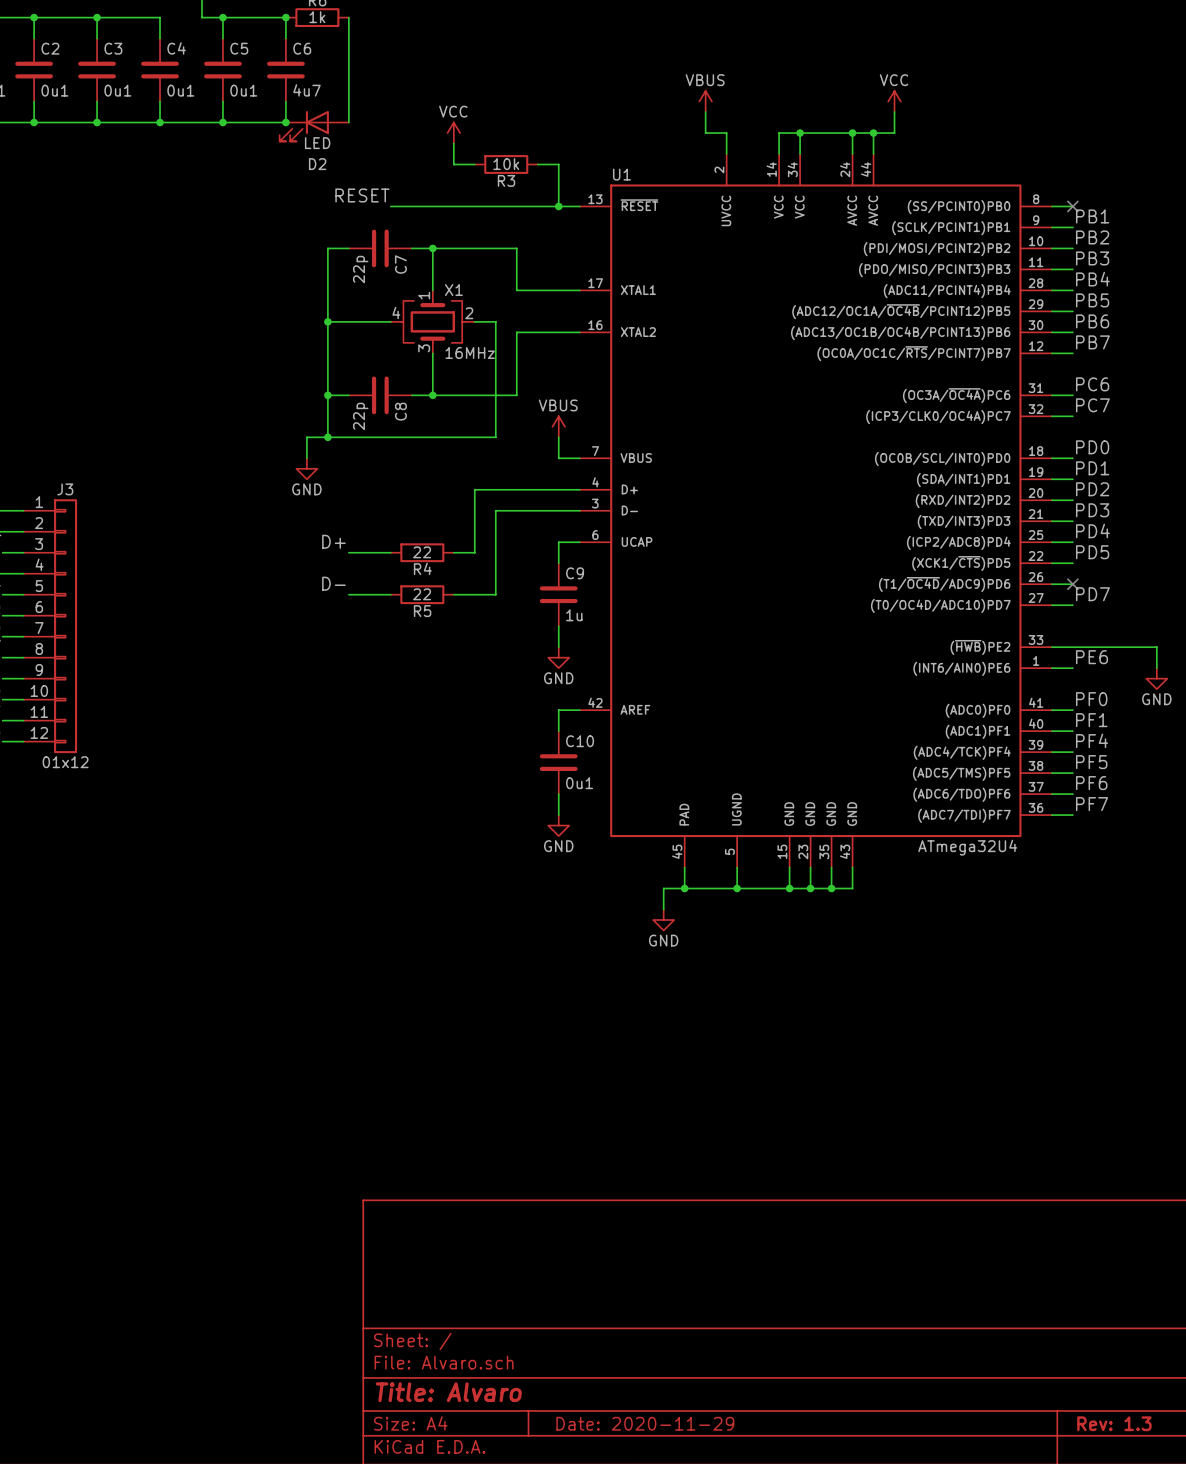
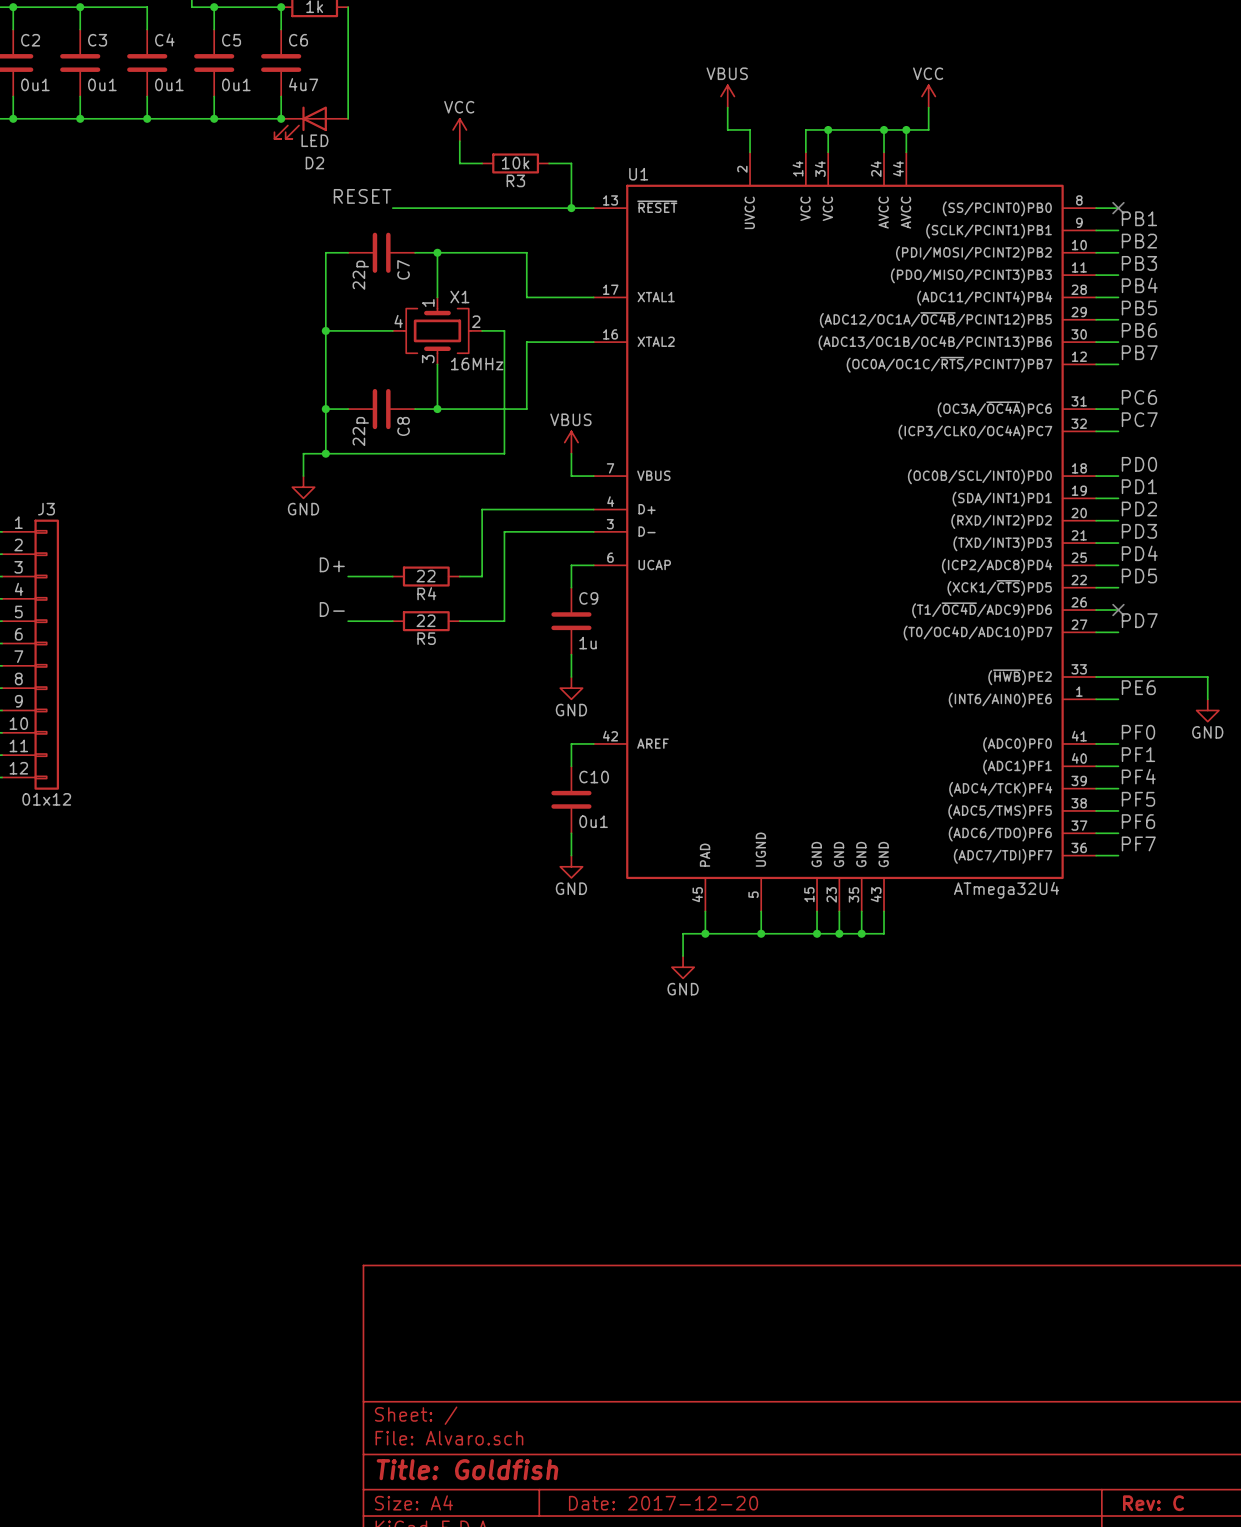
title block: Title: Alvaro (448, 1392) -> Title: Goldfish (467, 1469)
title block: Date: 2020-11-29 (645, 1423) -> Date: 2017-12-20 (663, 1503)
title block: Rev: 1.3 (1114, 1423) -> Rev: C (1153, 1503)

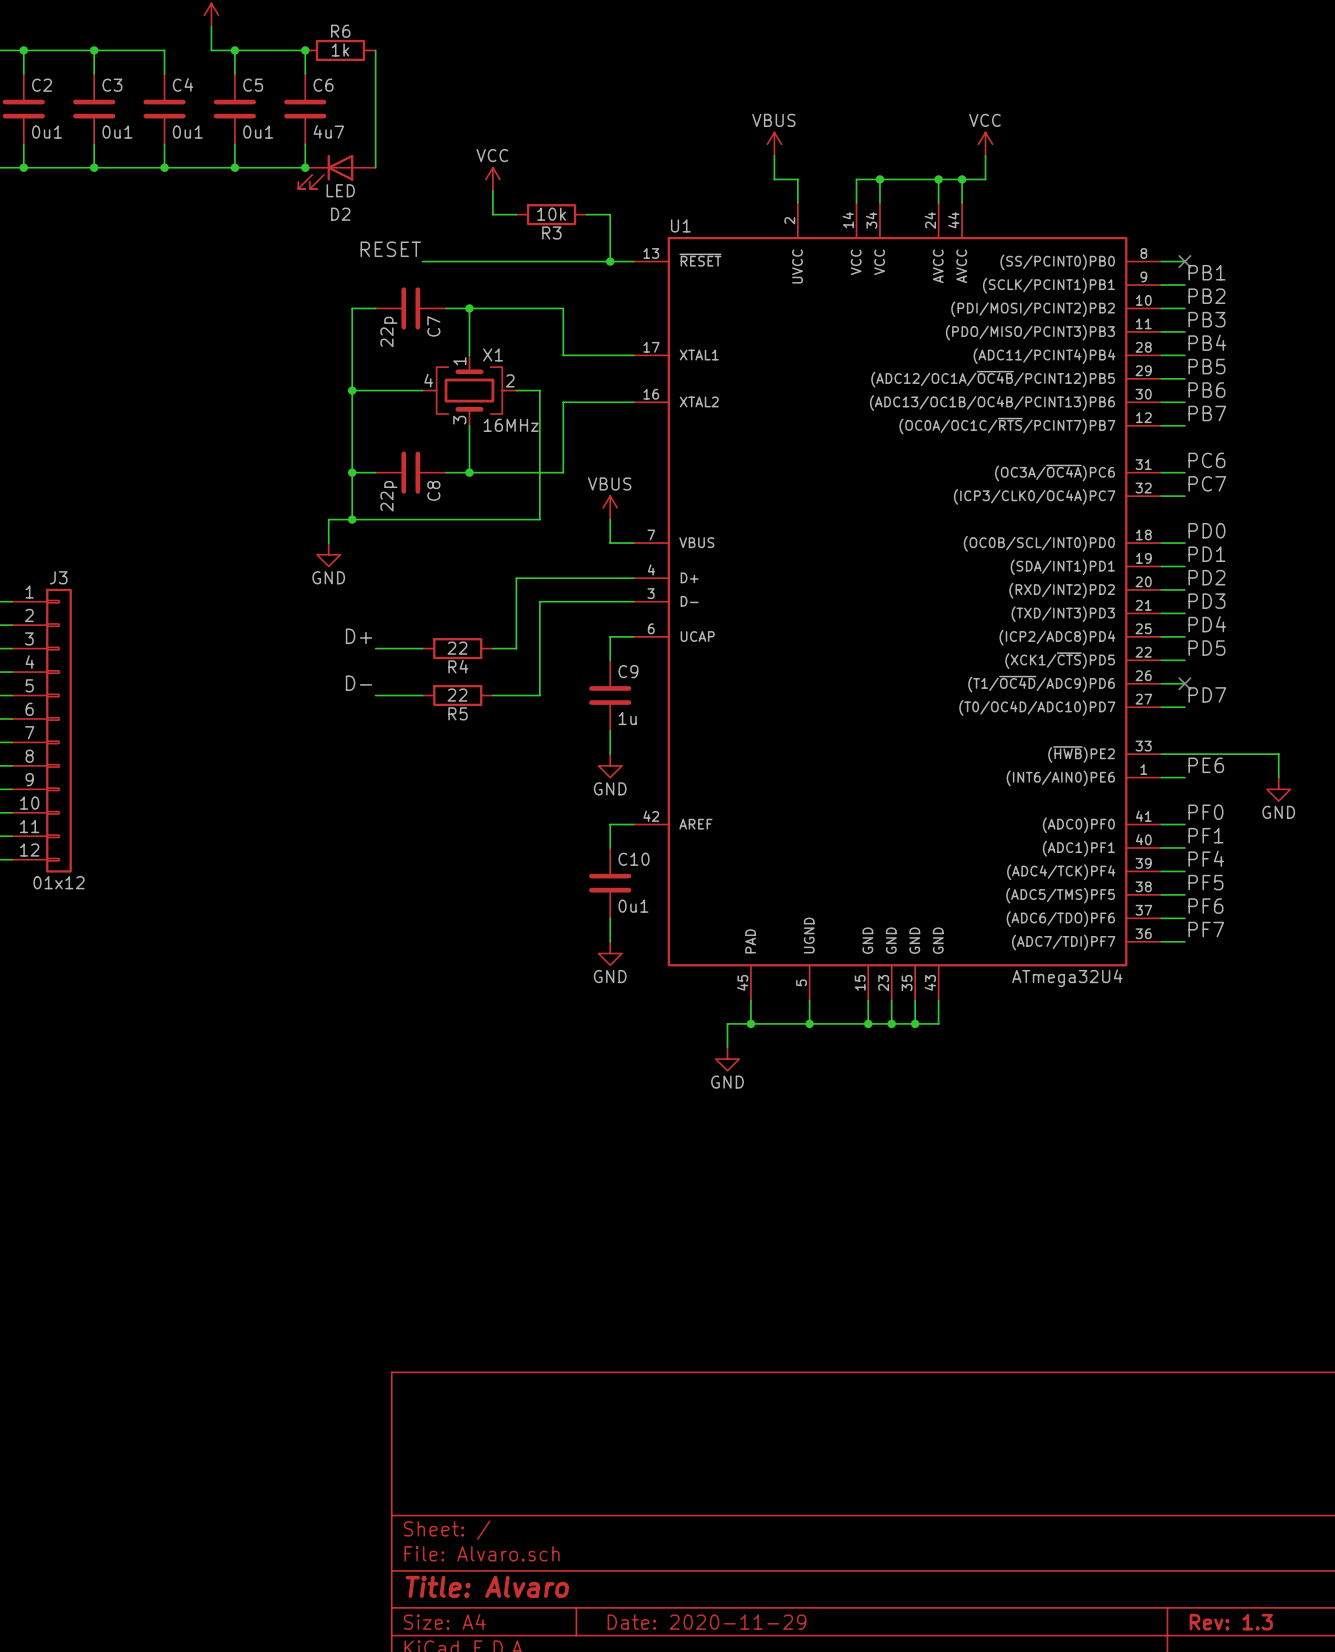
title block: Title: Goldfish (467, 1469) -> Title: Alvaro (487, 1586)
title block: Date: 2017-12-20 (663, 1503) -> Date: 2020-11-29 (706, 1622)
title block: Rev: C (1153, 1503) -> Rev: 1.3 (1231, 1622)

